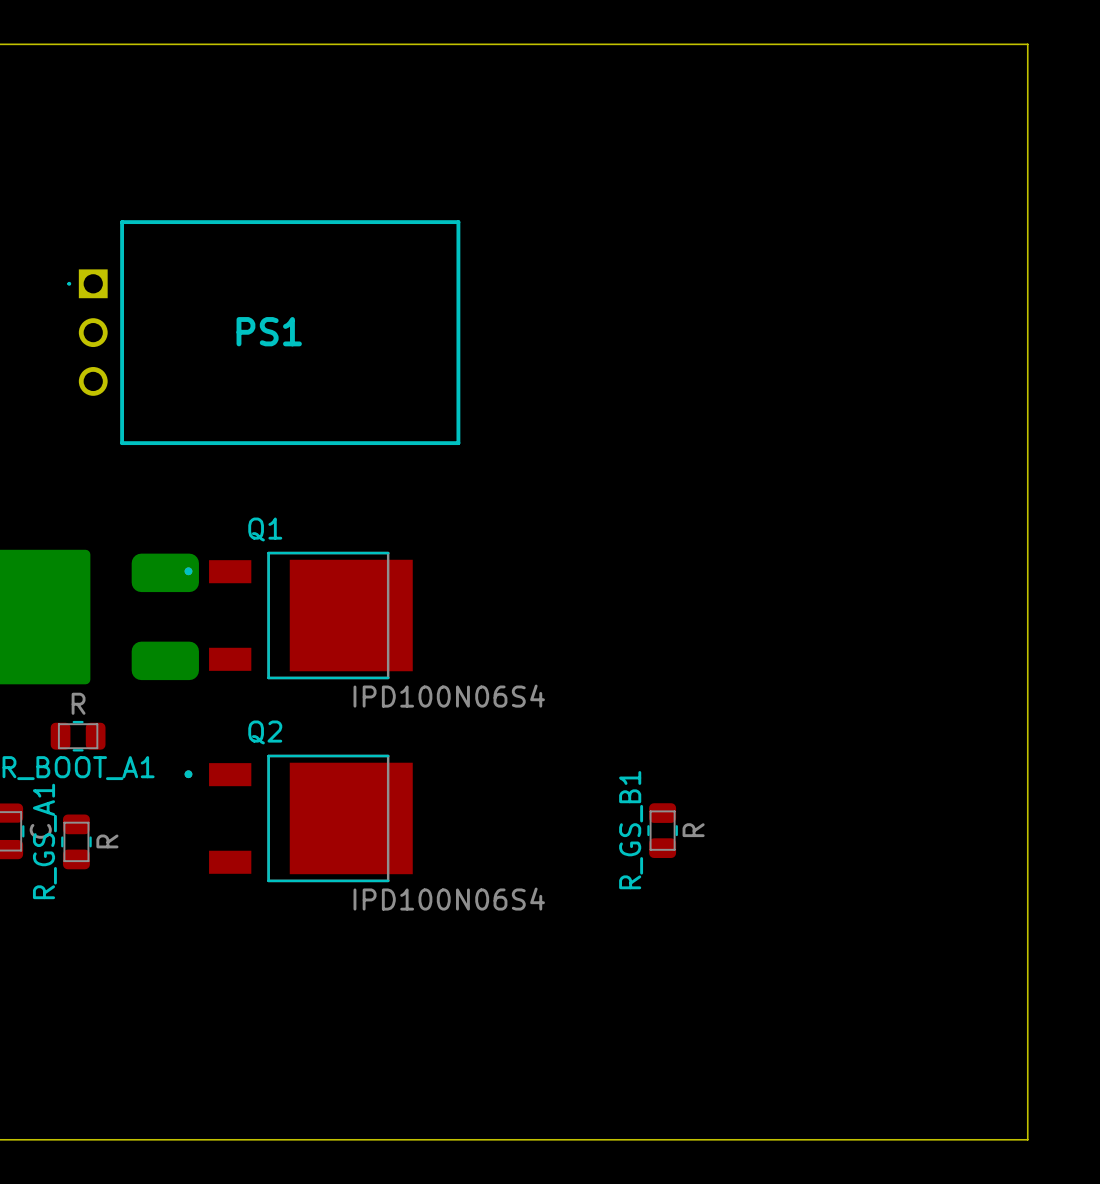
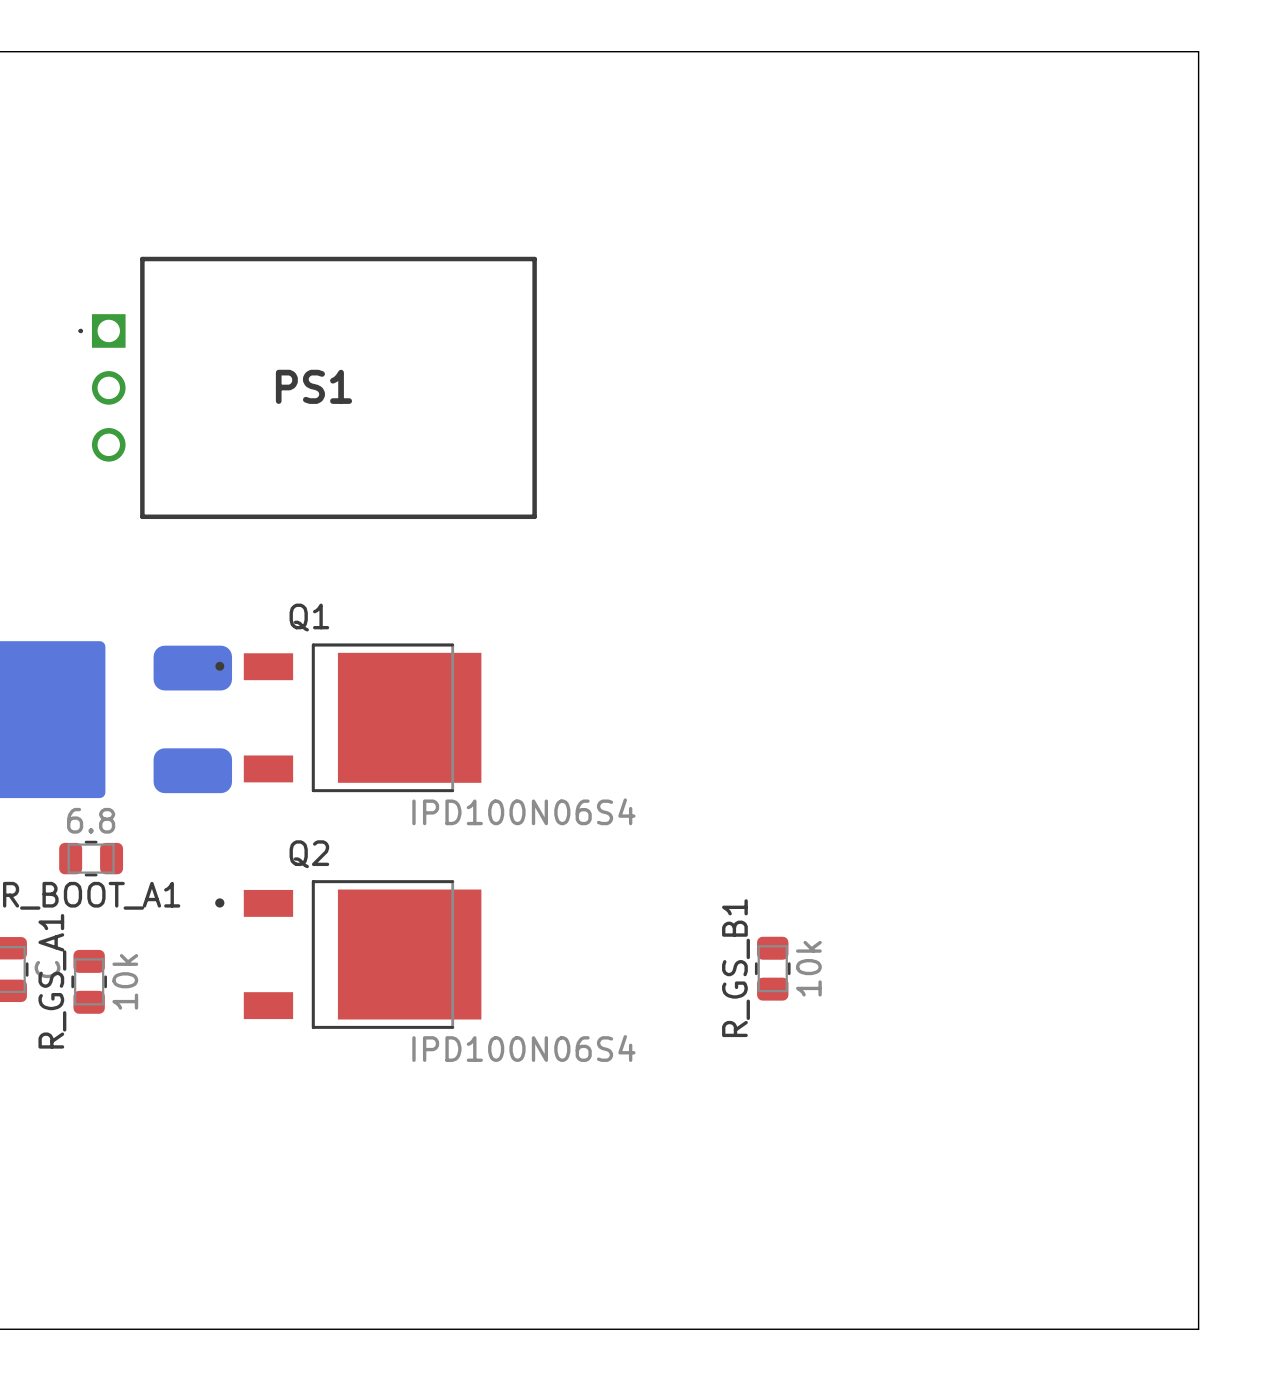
R_BOOT_A1 value: R (78, 703) -> 6.8 (91, 820)
R_GS_B1 value: R (693, 830) -> 10k (808, 968)
R_GS_A1 value: R (107, 841) -> 10k (125, 981)

